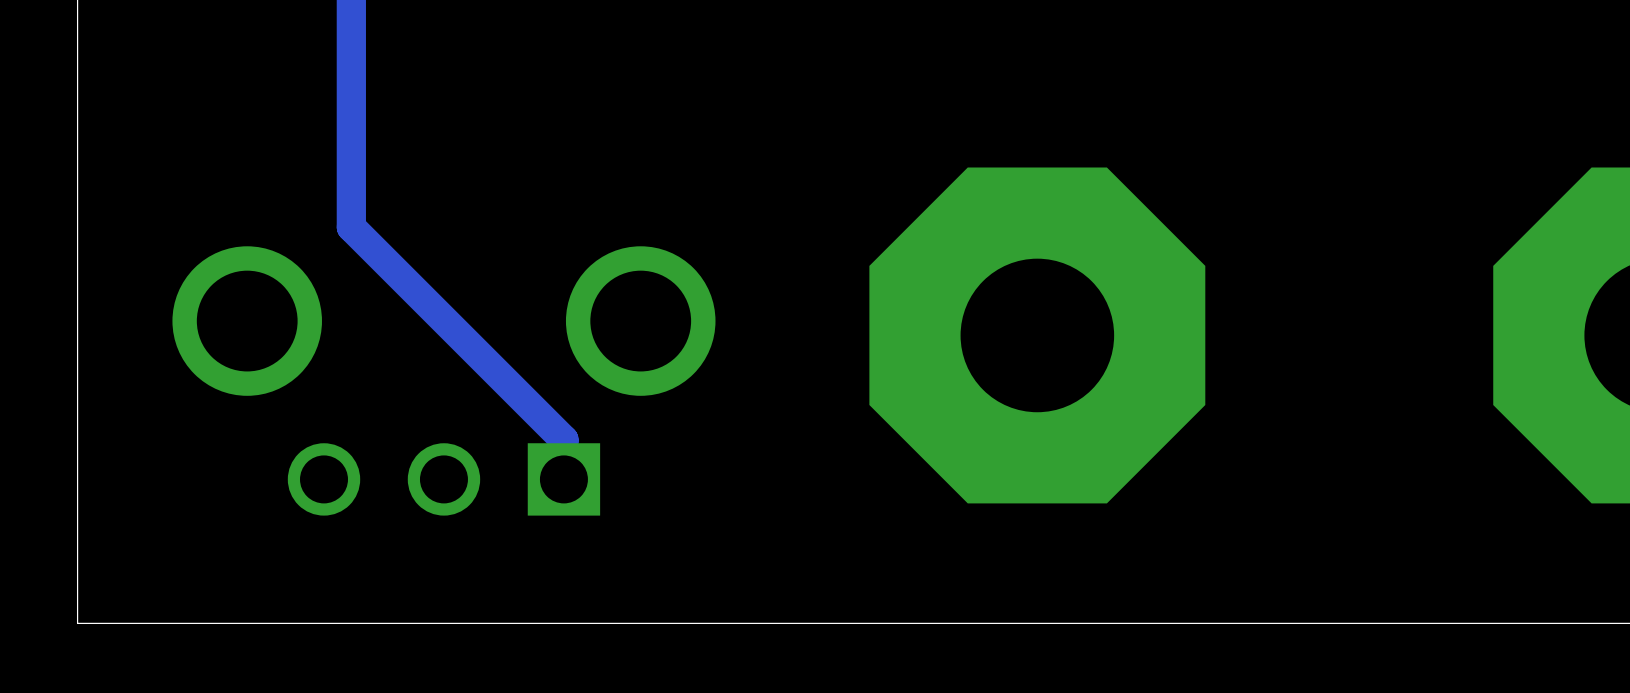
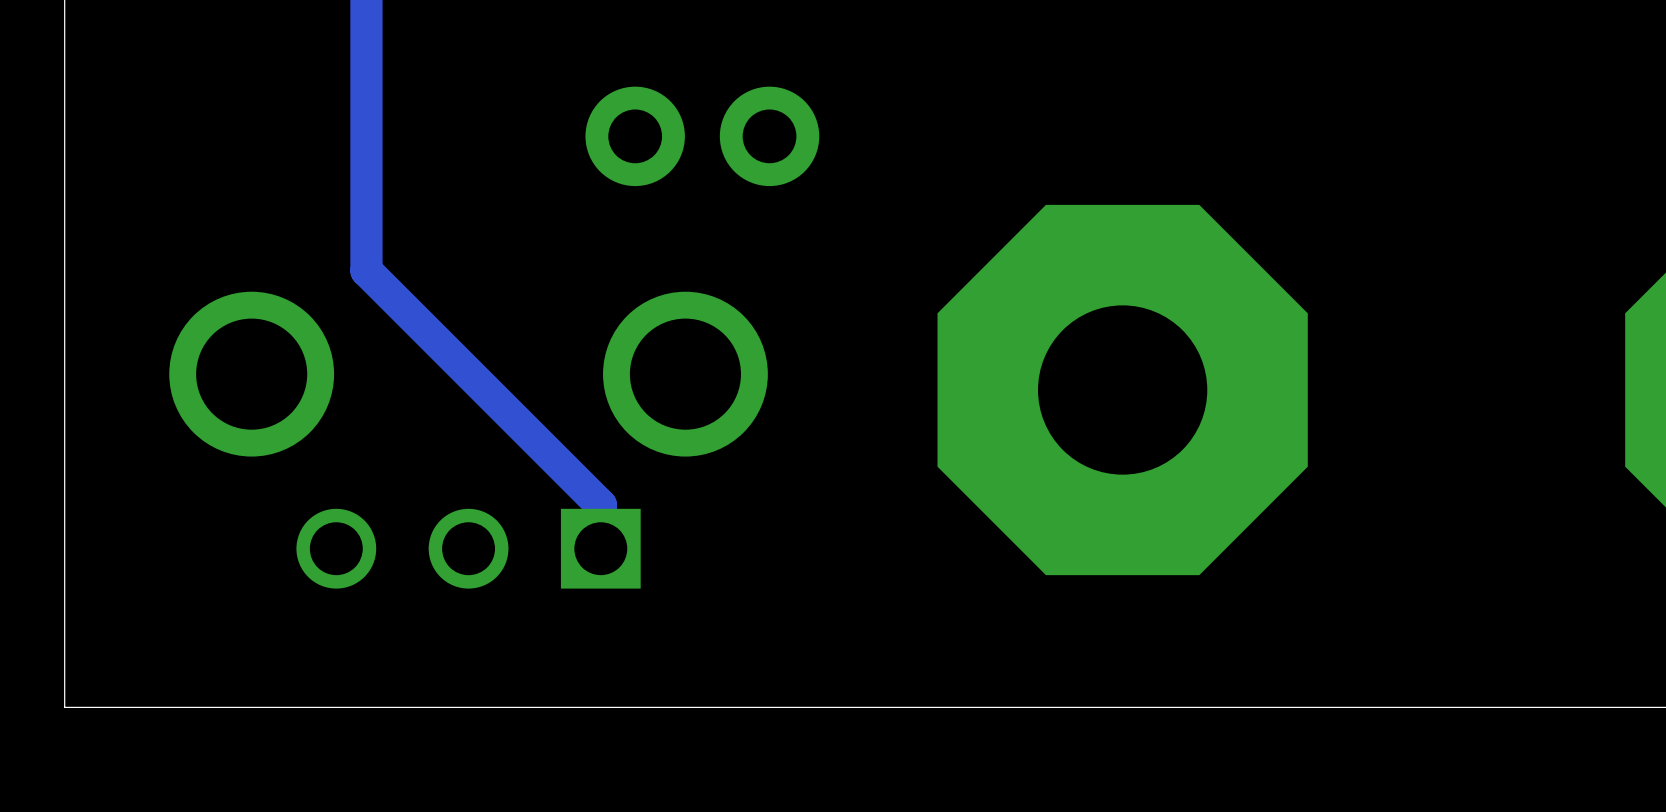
part: none -> (702, 136)

